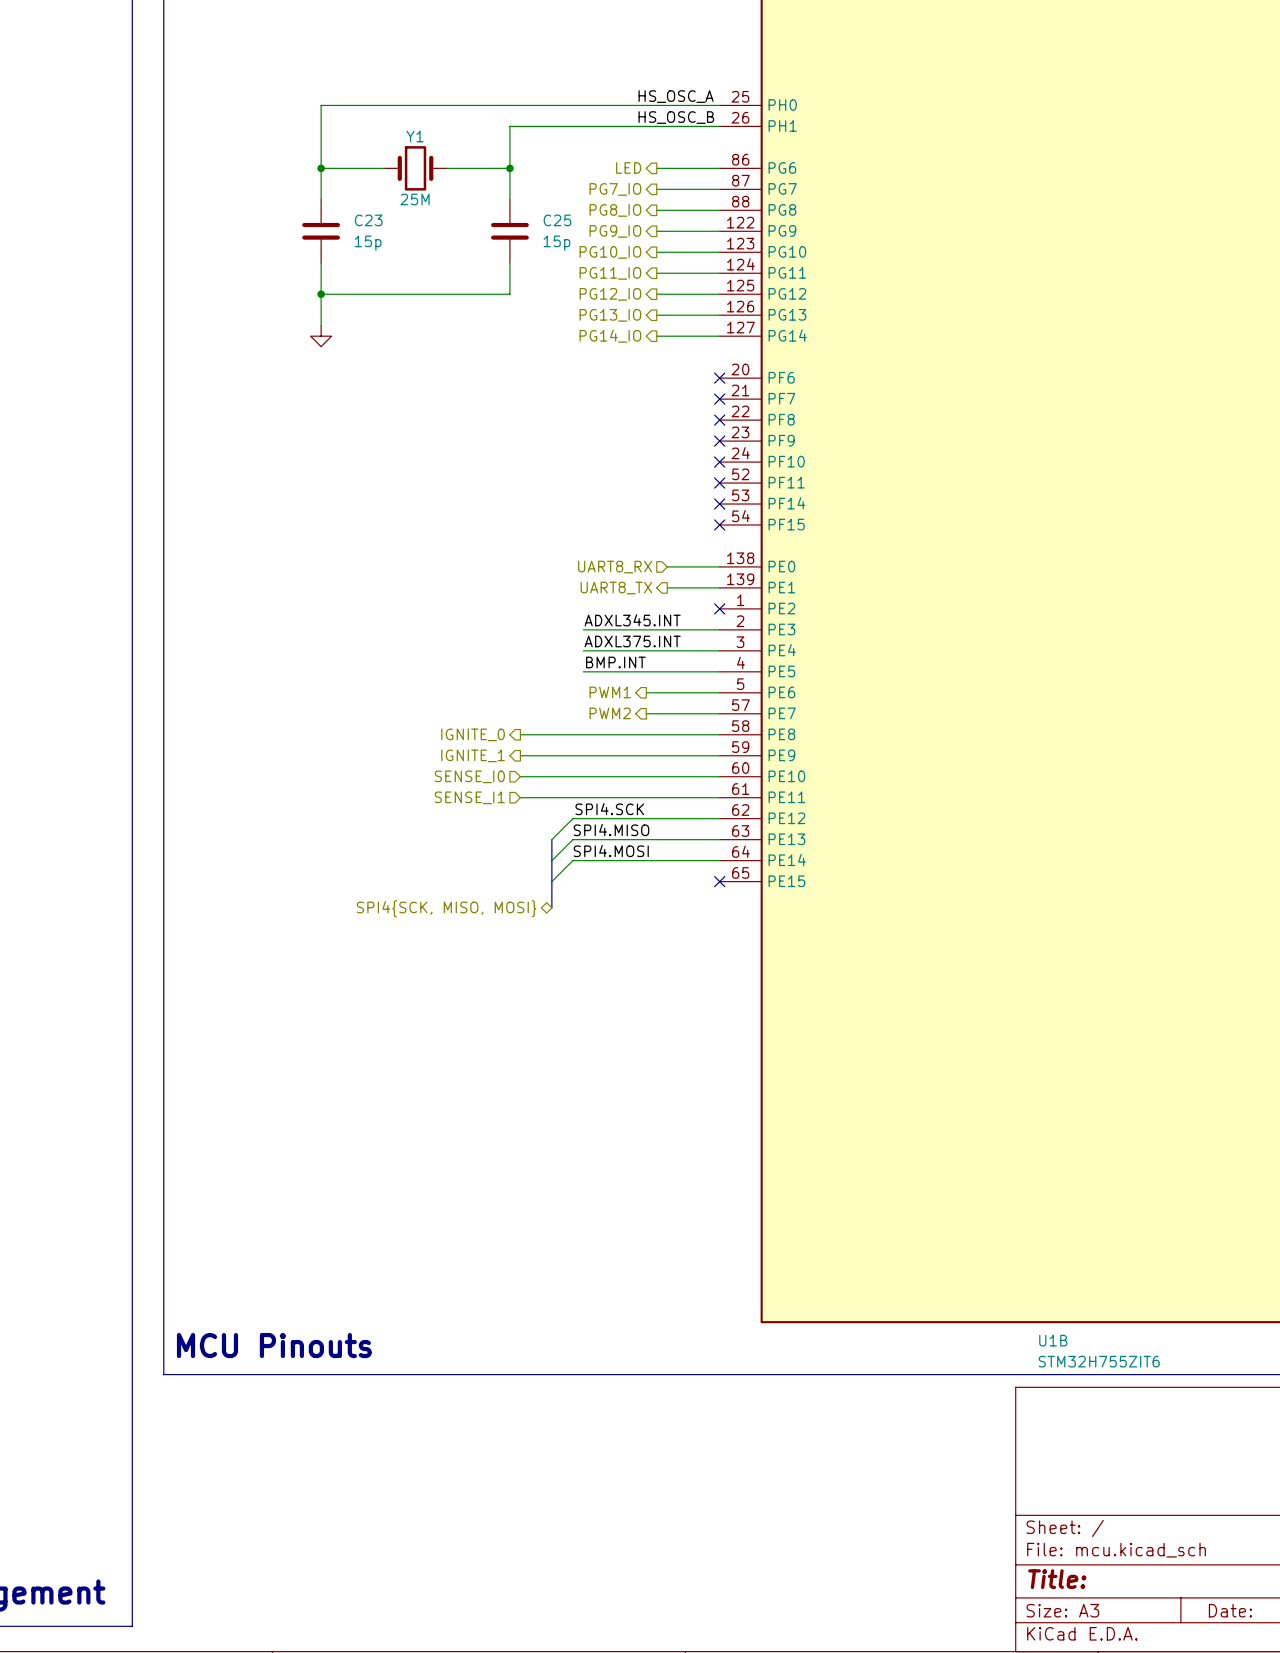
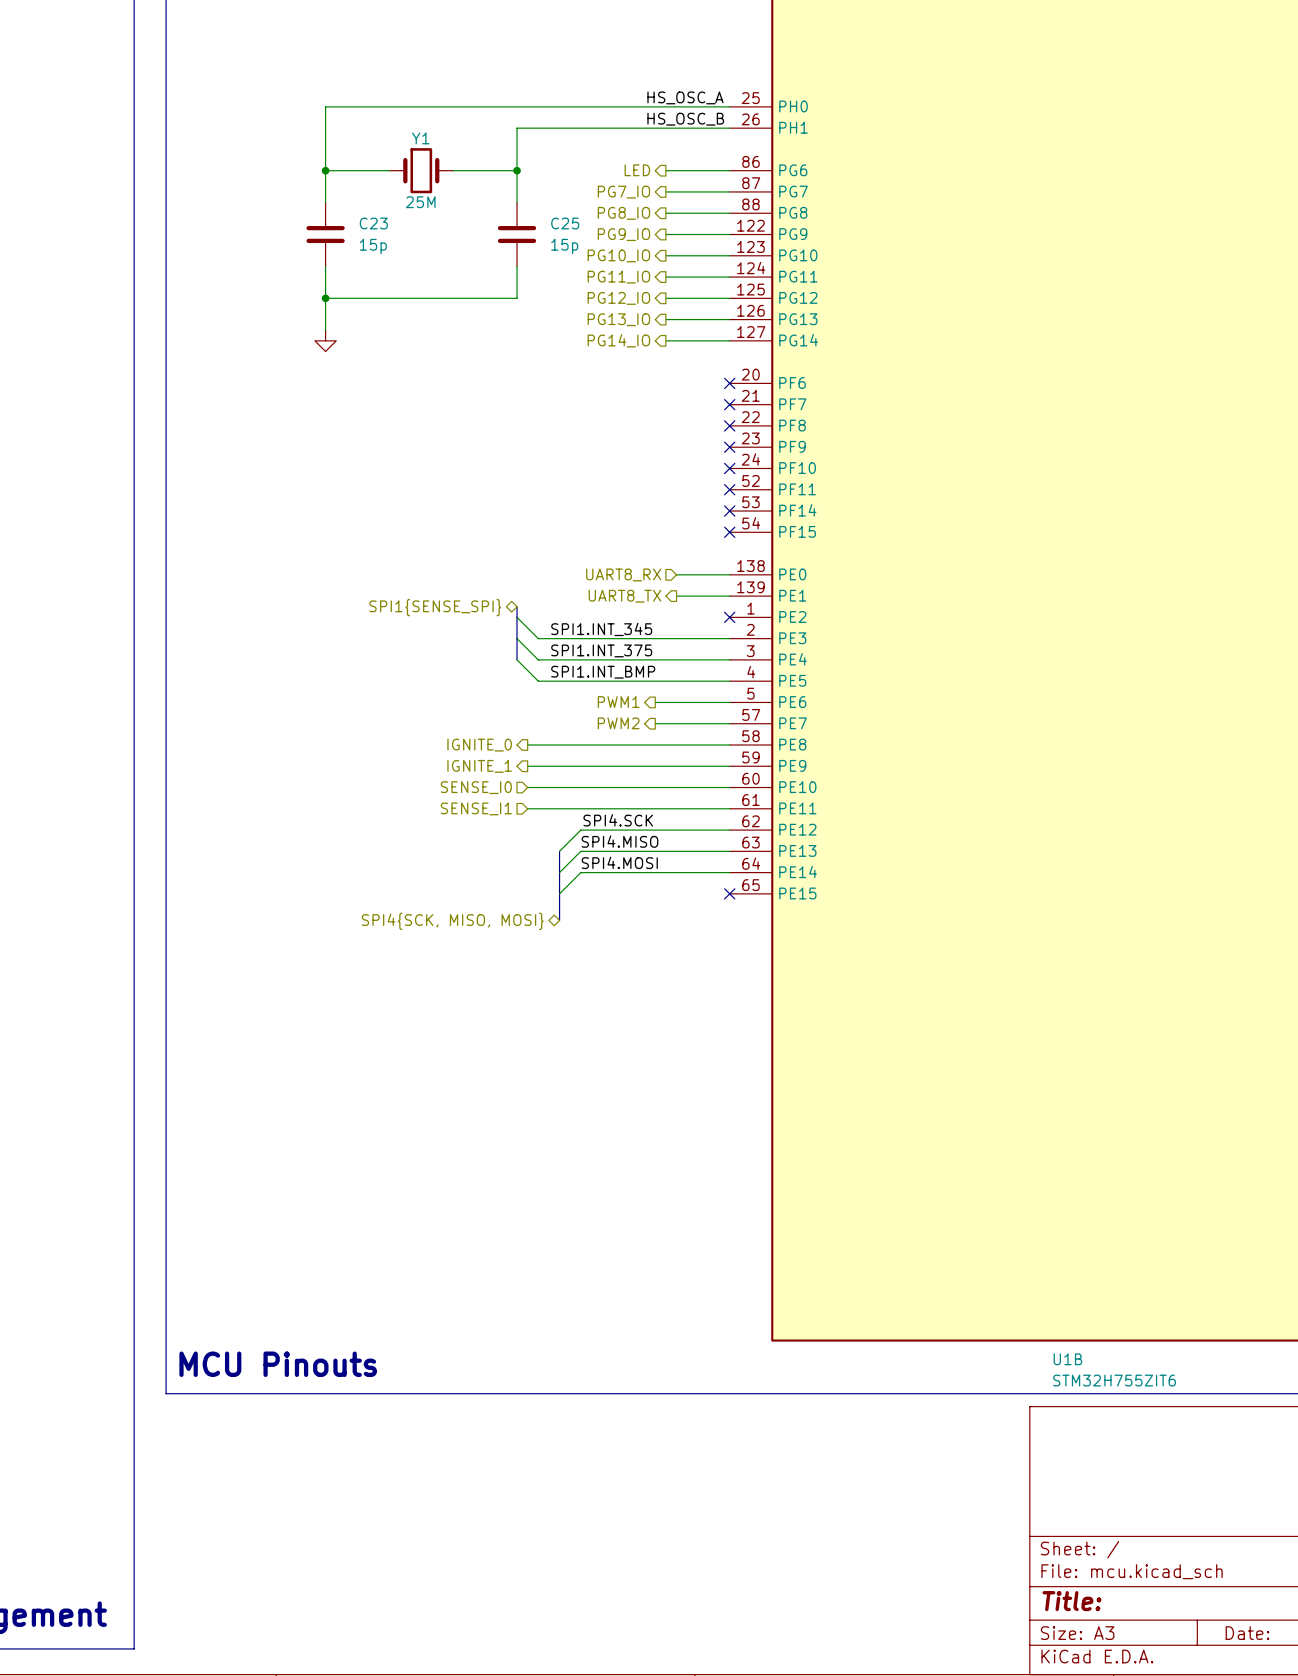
bus: none -> (517, 606) (517, 659)
hierarchical label: none -> SPI1{SENSE_SPI} (435, 607)
wire: none -> (517, 617) (538, 638) (591, 638)
label: none -> SPI1.INT_345 (601, 629)
label: ADXL345.INT (632, 620) -> none
wire: none -> (517, 638) (538, 659) (591, 659)
label: none -> SPI1.INT_375 (601, 650)
label: ADXL375.INT (632, 641) -> none
wire: none -> (517, 659) (538, 681) (591, 681)
label: none -> SPI1.INT_BMP (603, 672)
label: BMP.INT (615, 662) -> none

